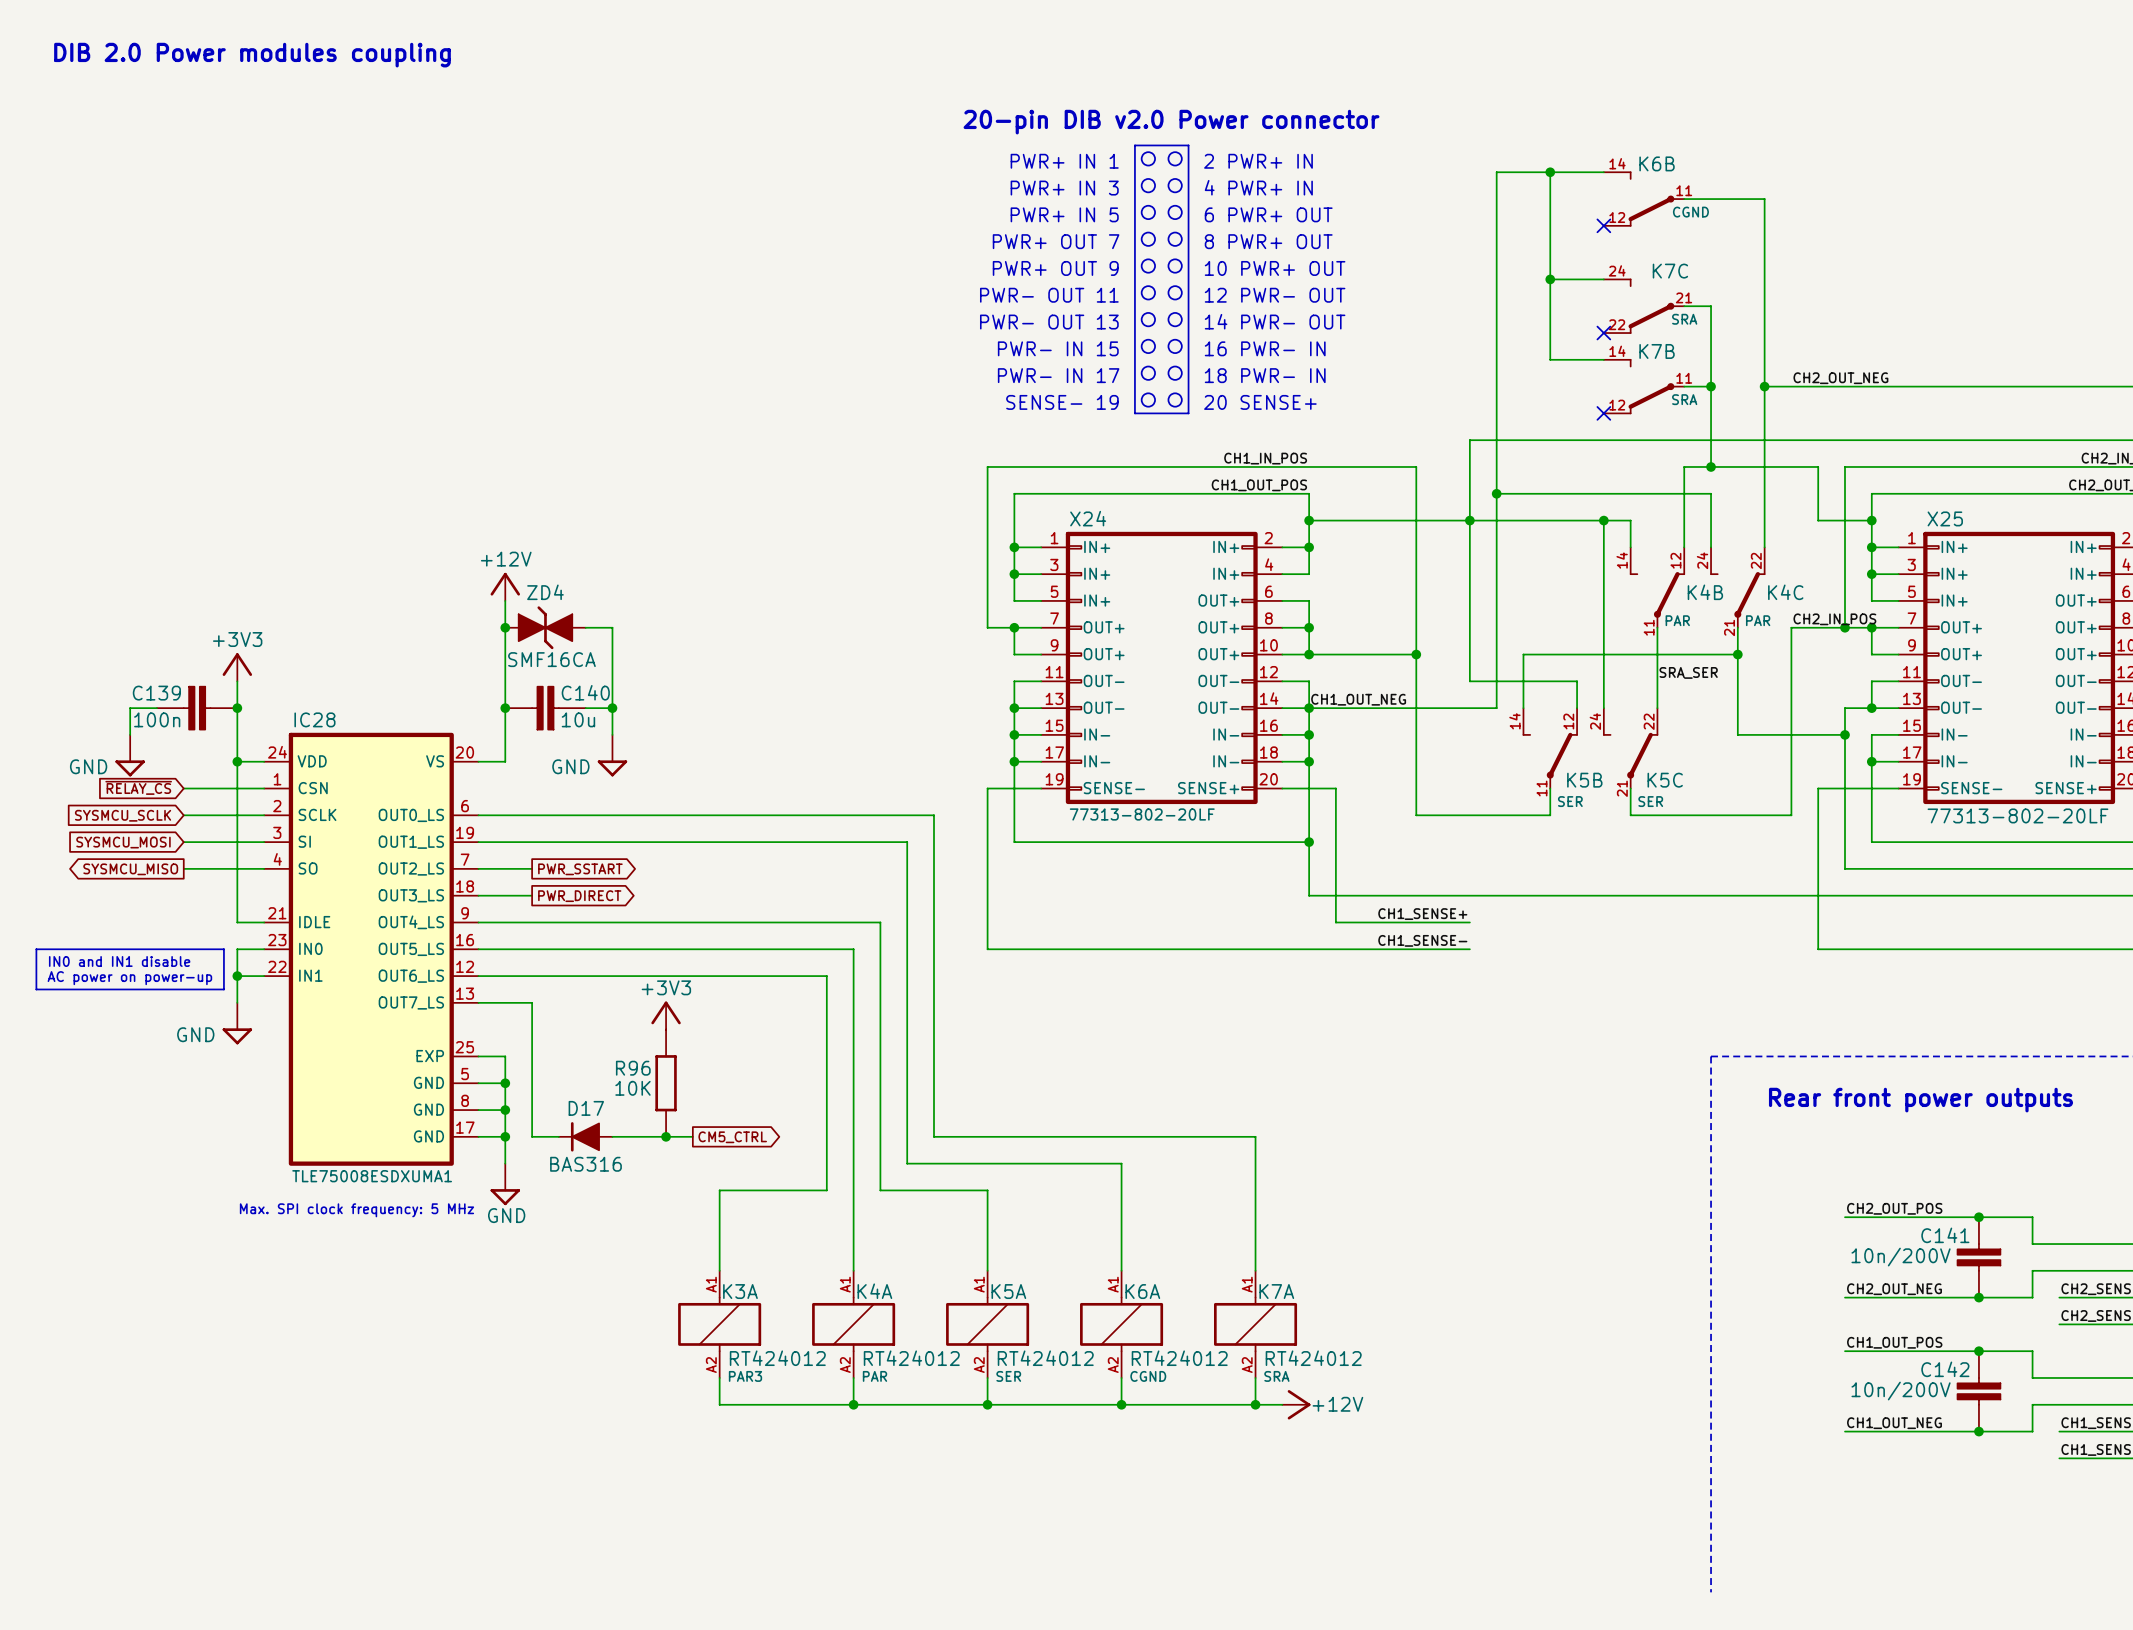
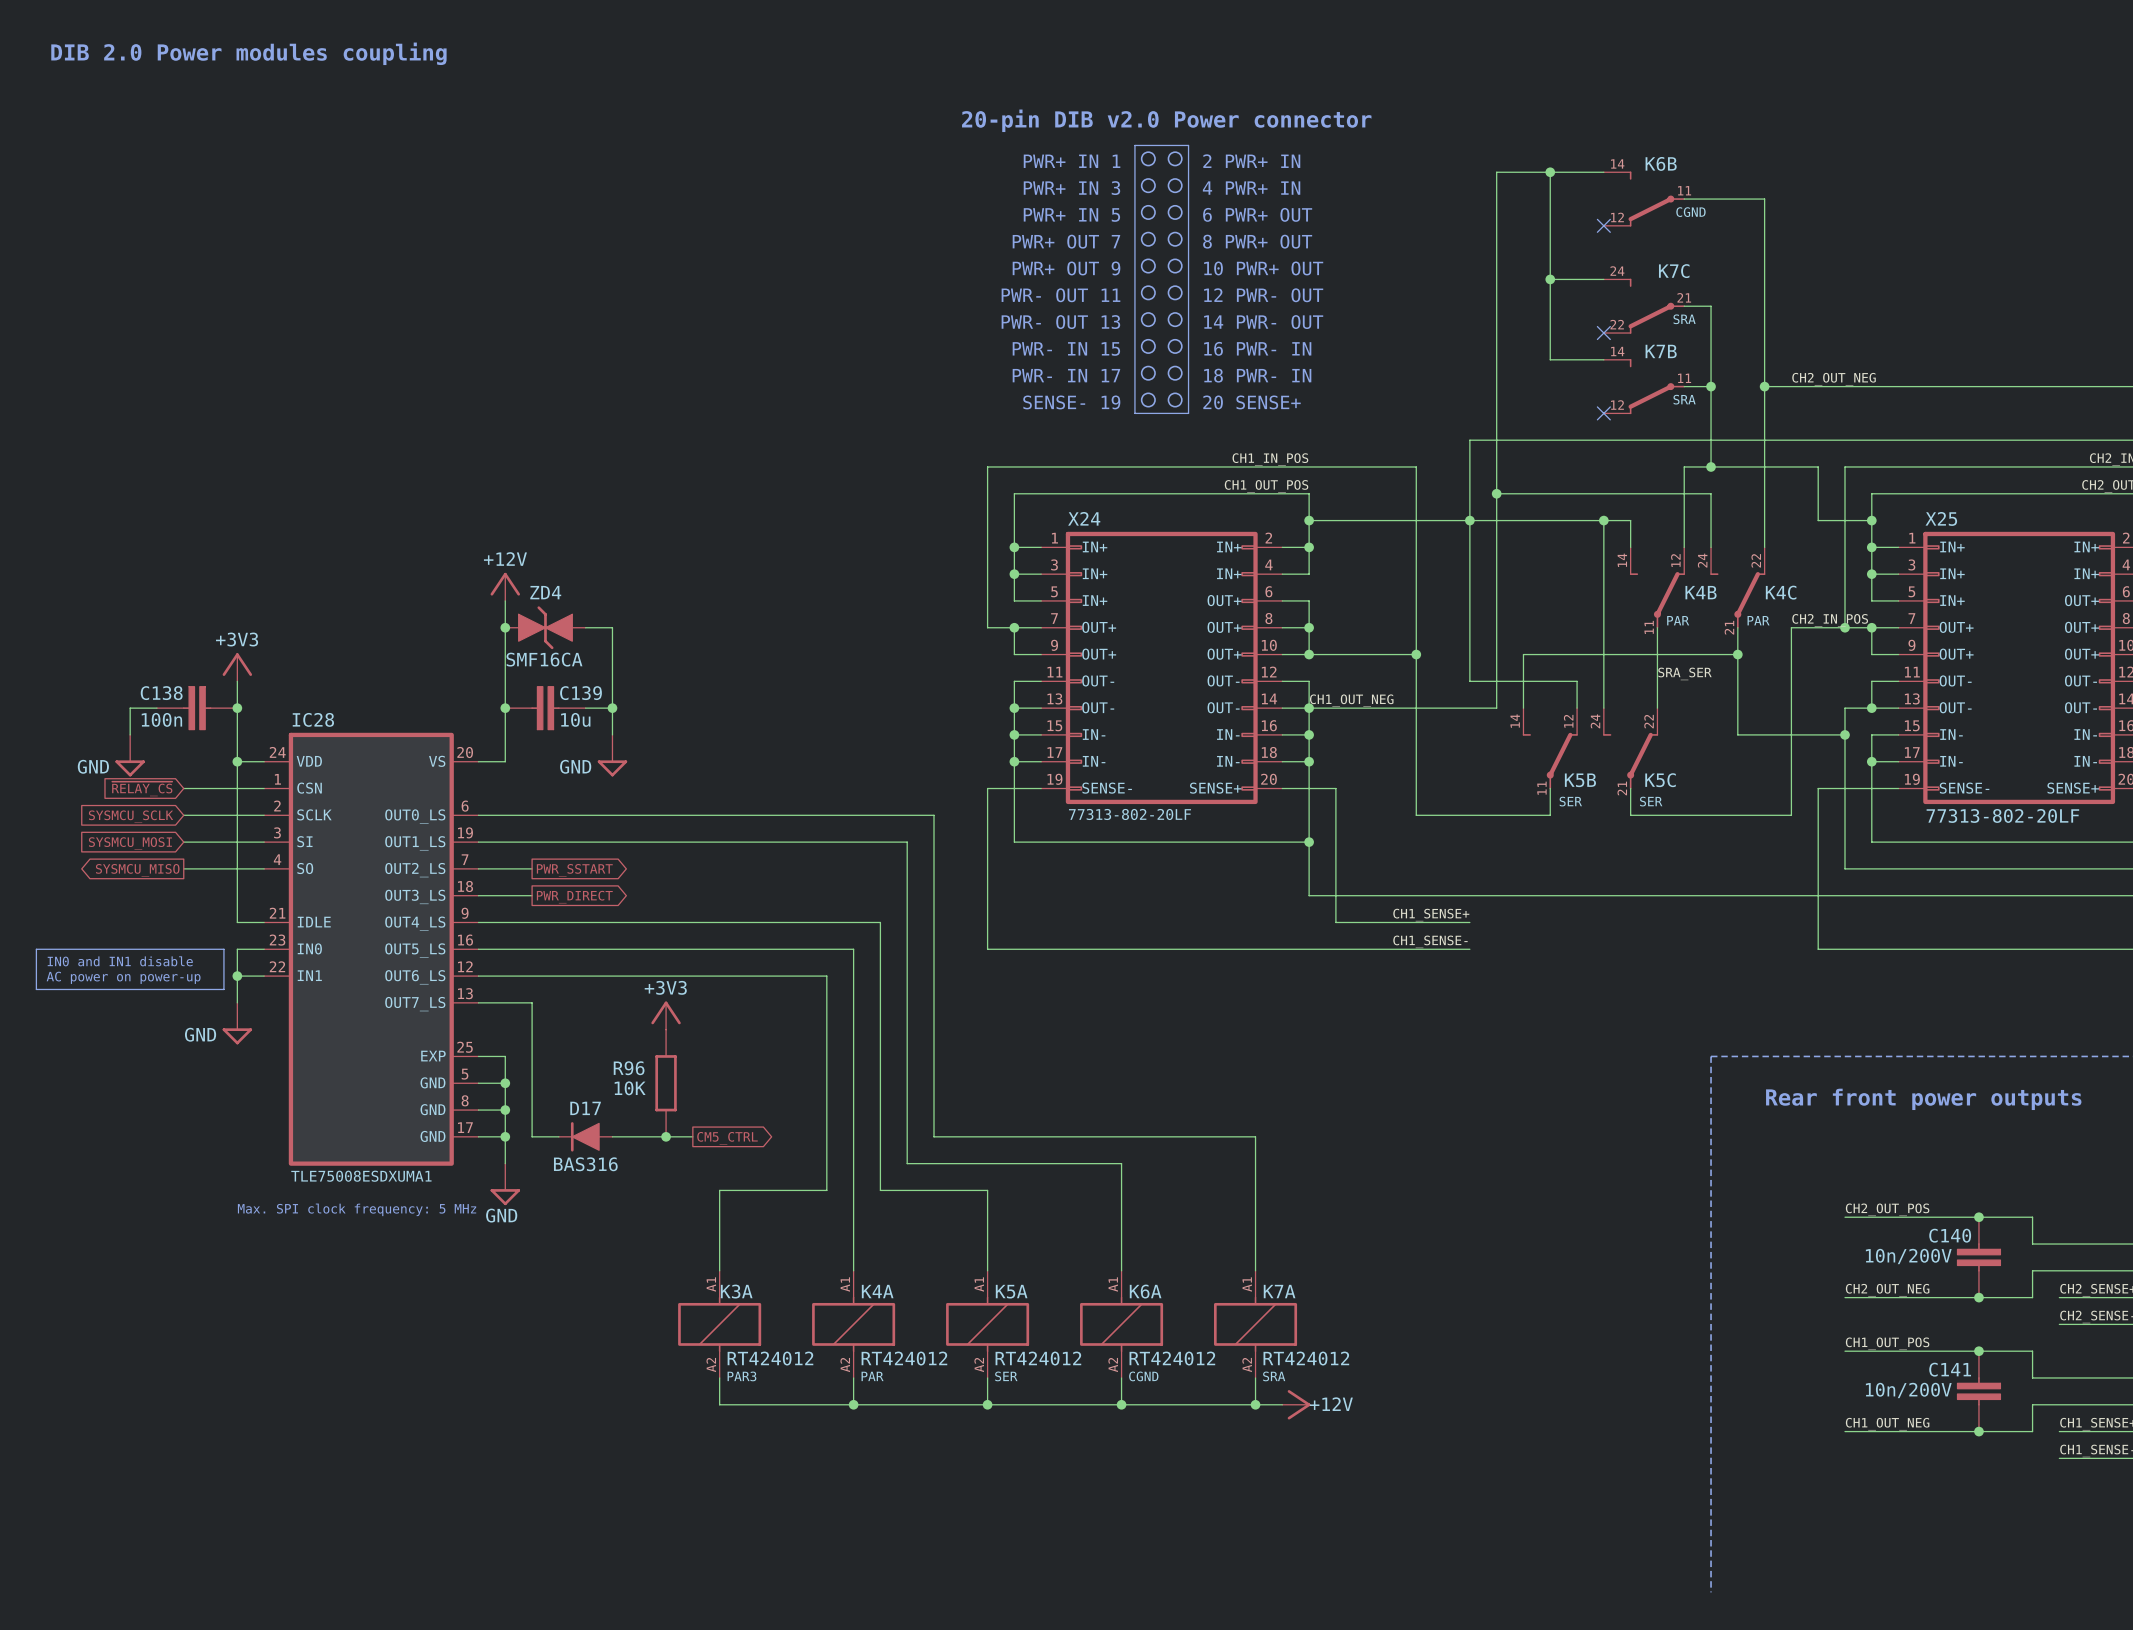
C140 name: C140 (585, 692) -> C139 (581, 693)
C139 name: C139 (156, 693) -> C138 (161, 693)
C141 name: C141 (1945, 1235) -> C140 (1950, 1235)
C142 name: C142 (1945, 1369) -> C141 (1950, 1369)

